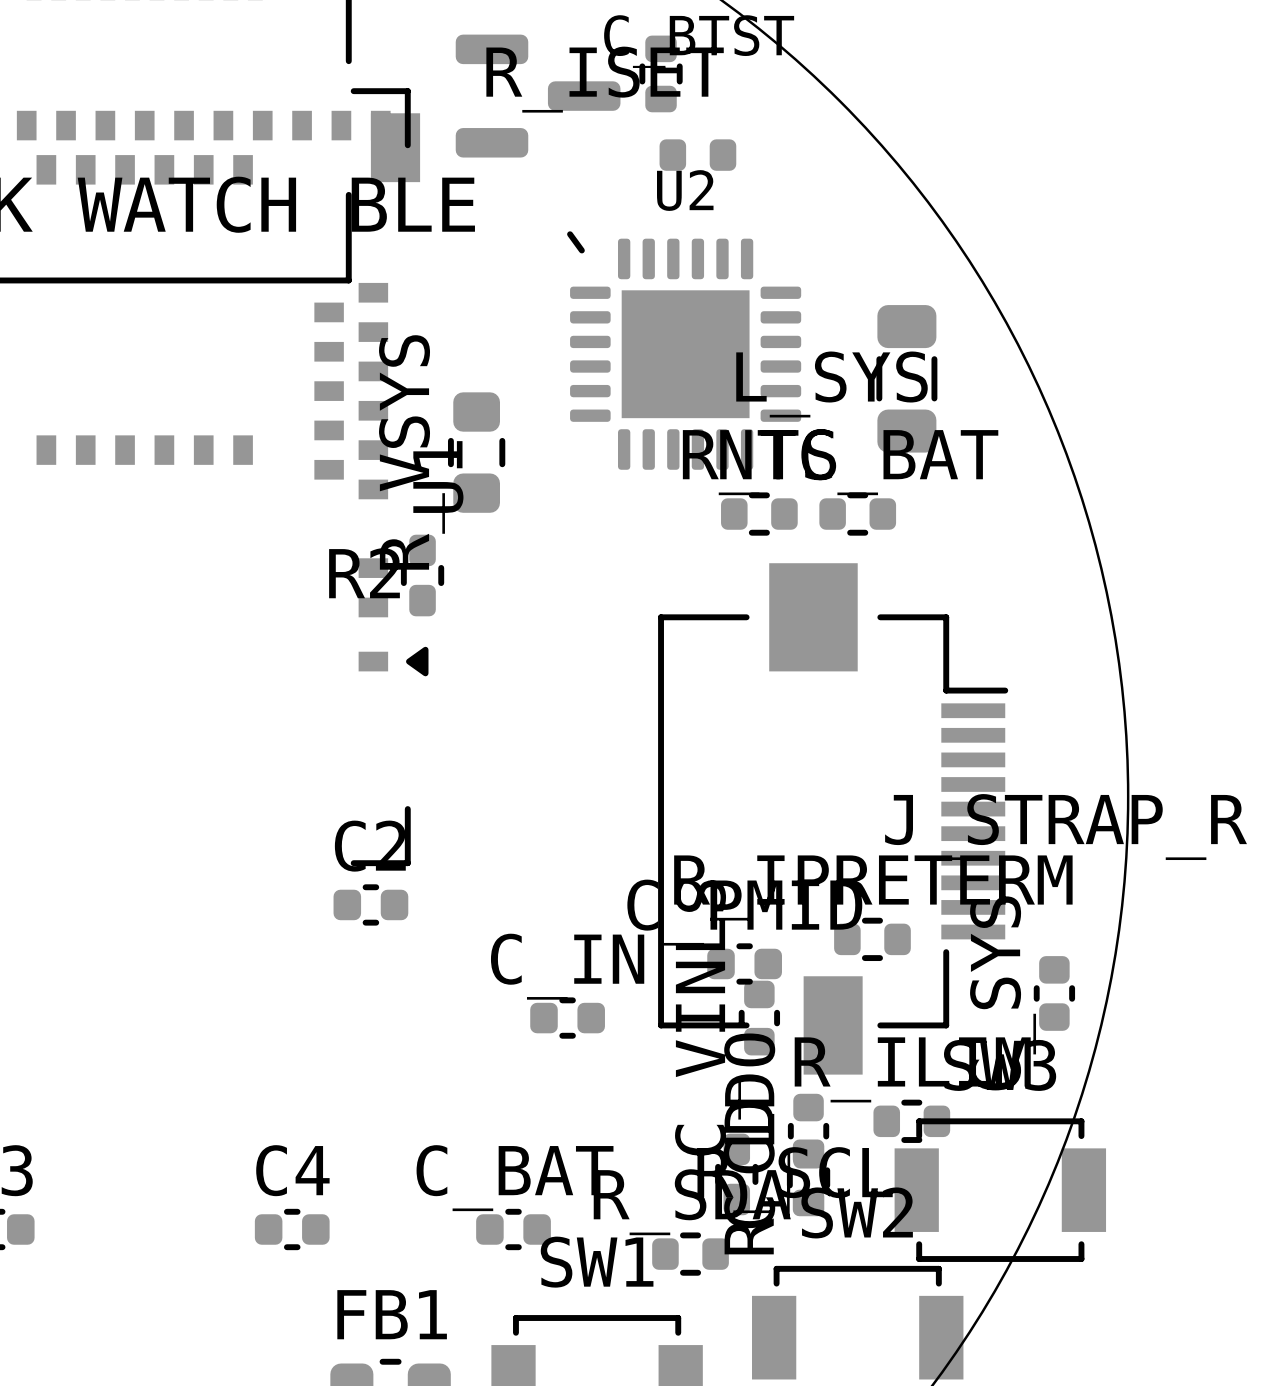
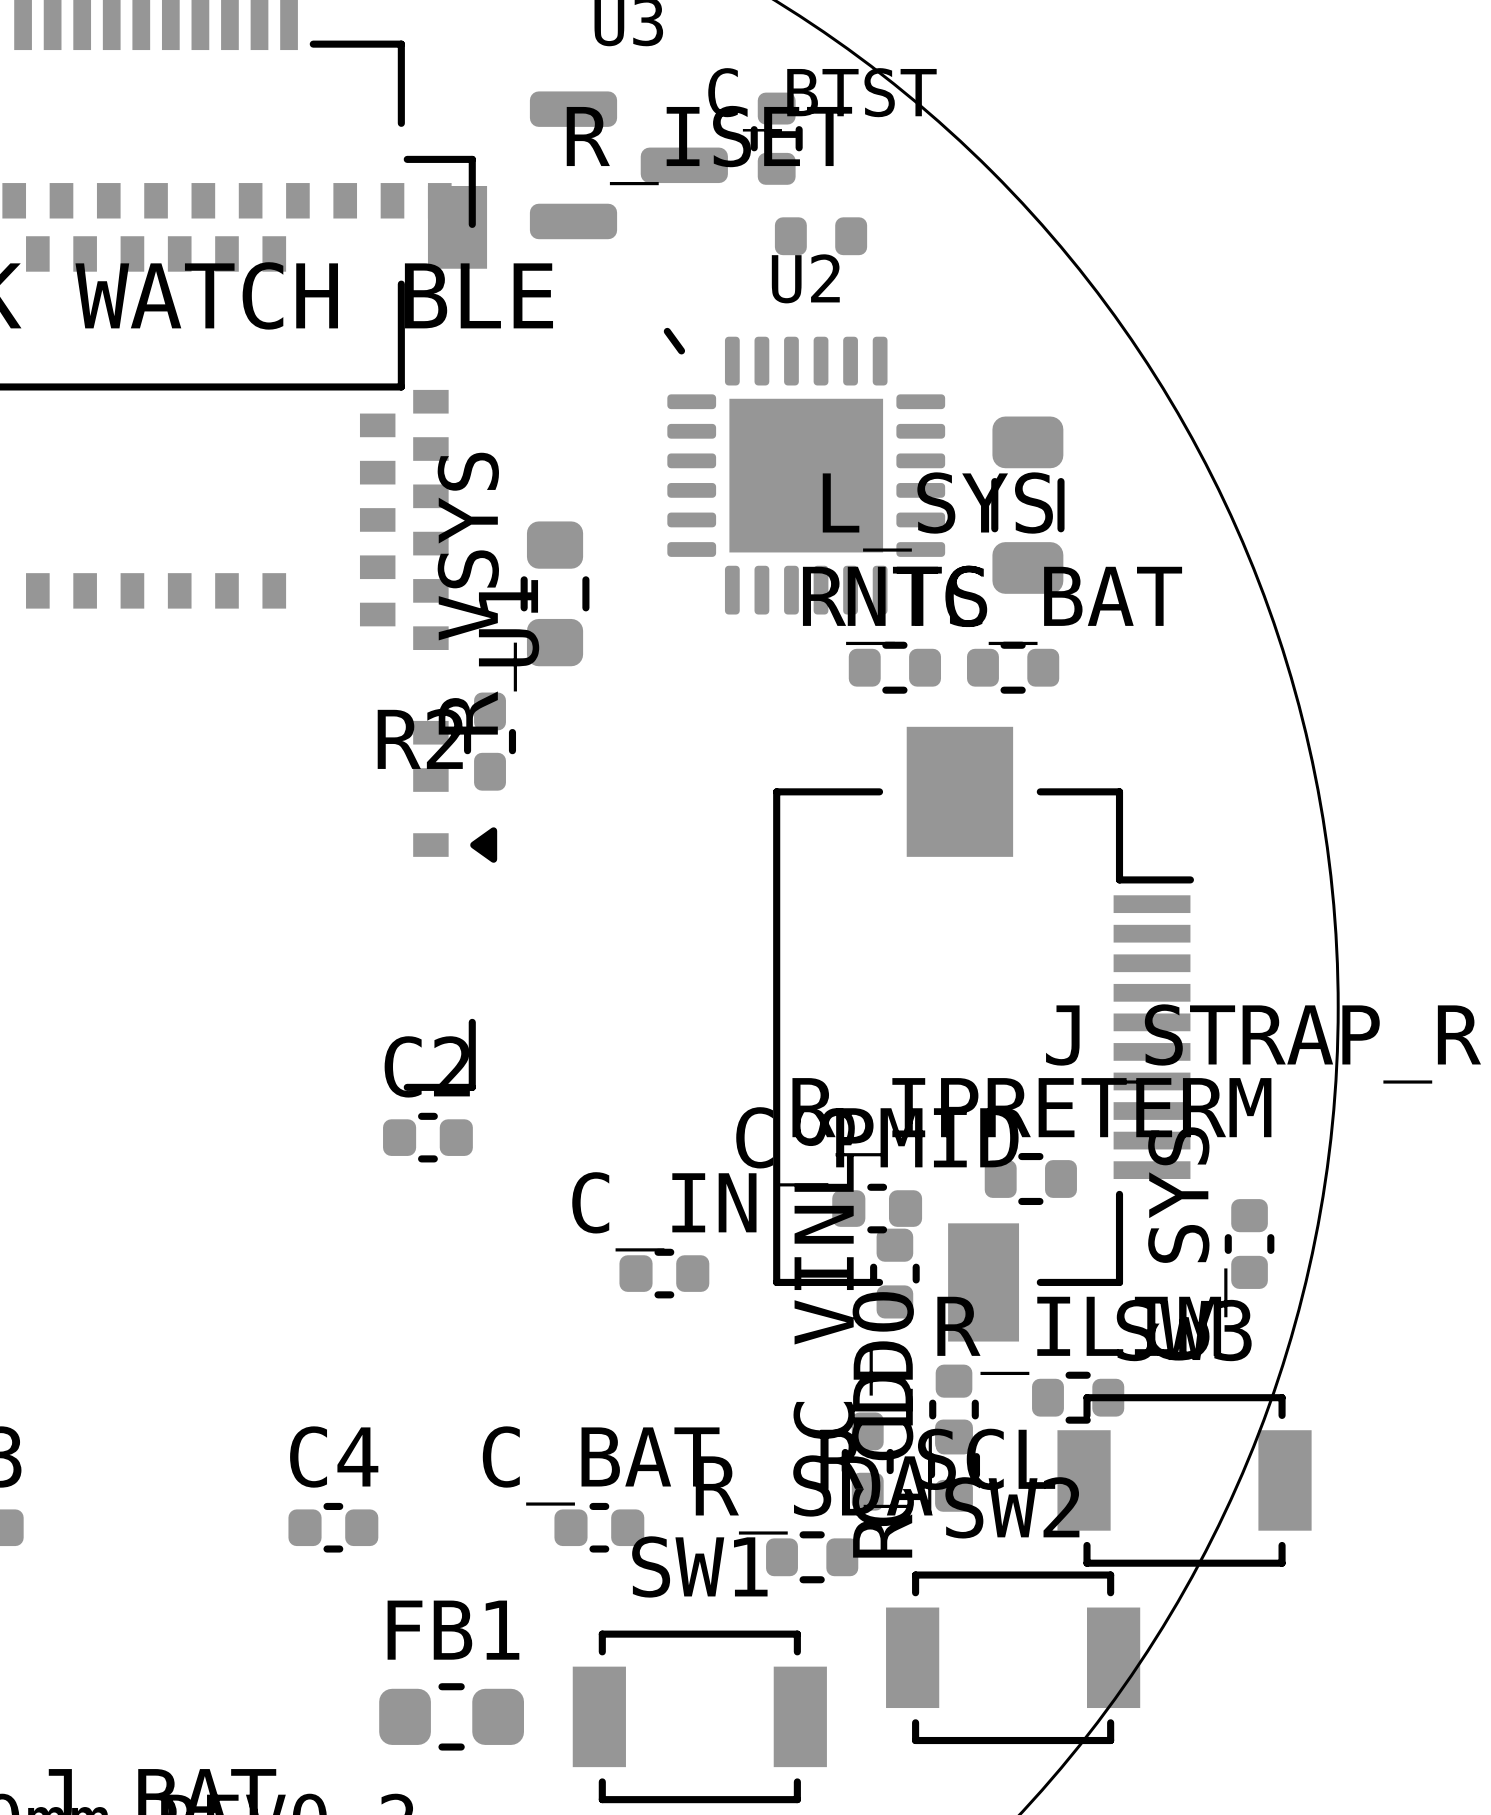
L_SYS position: (906, 378) -> (1027, 505)

